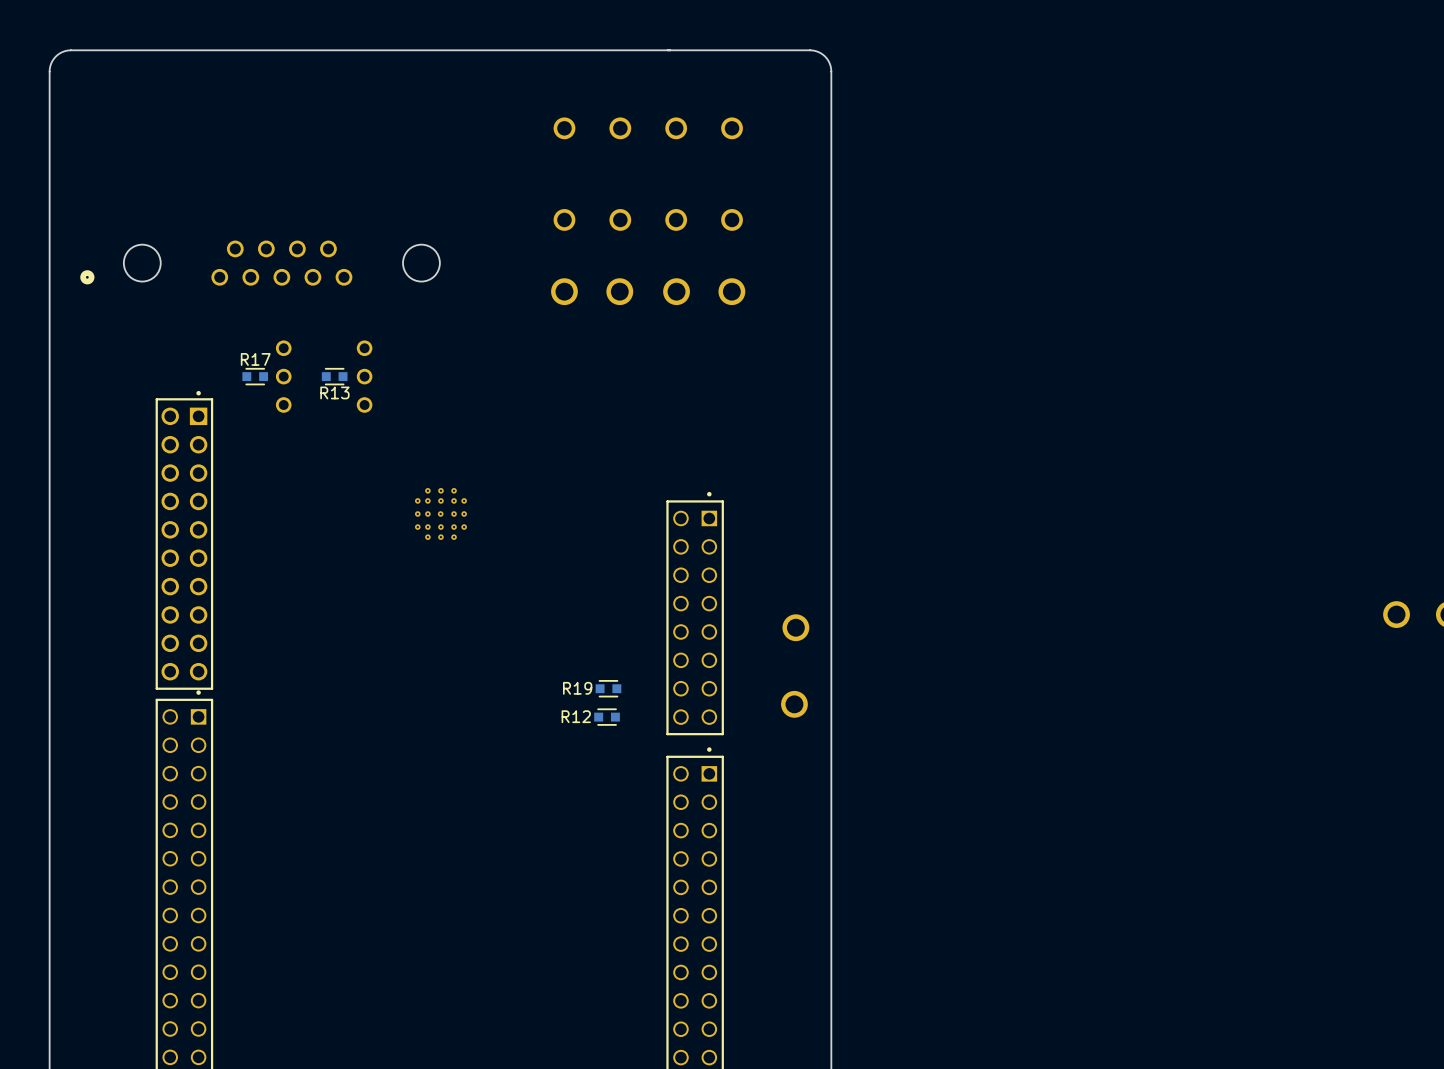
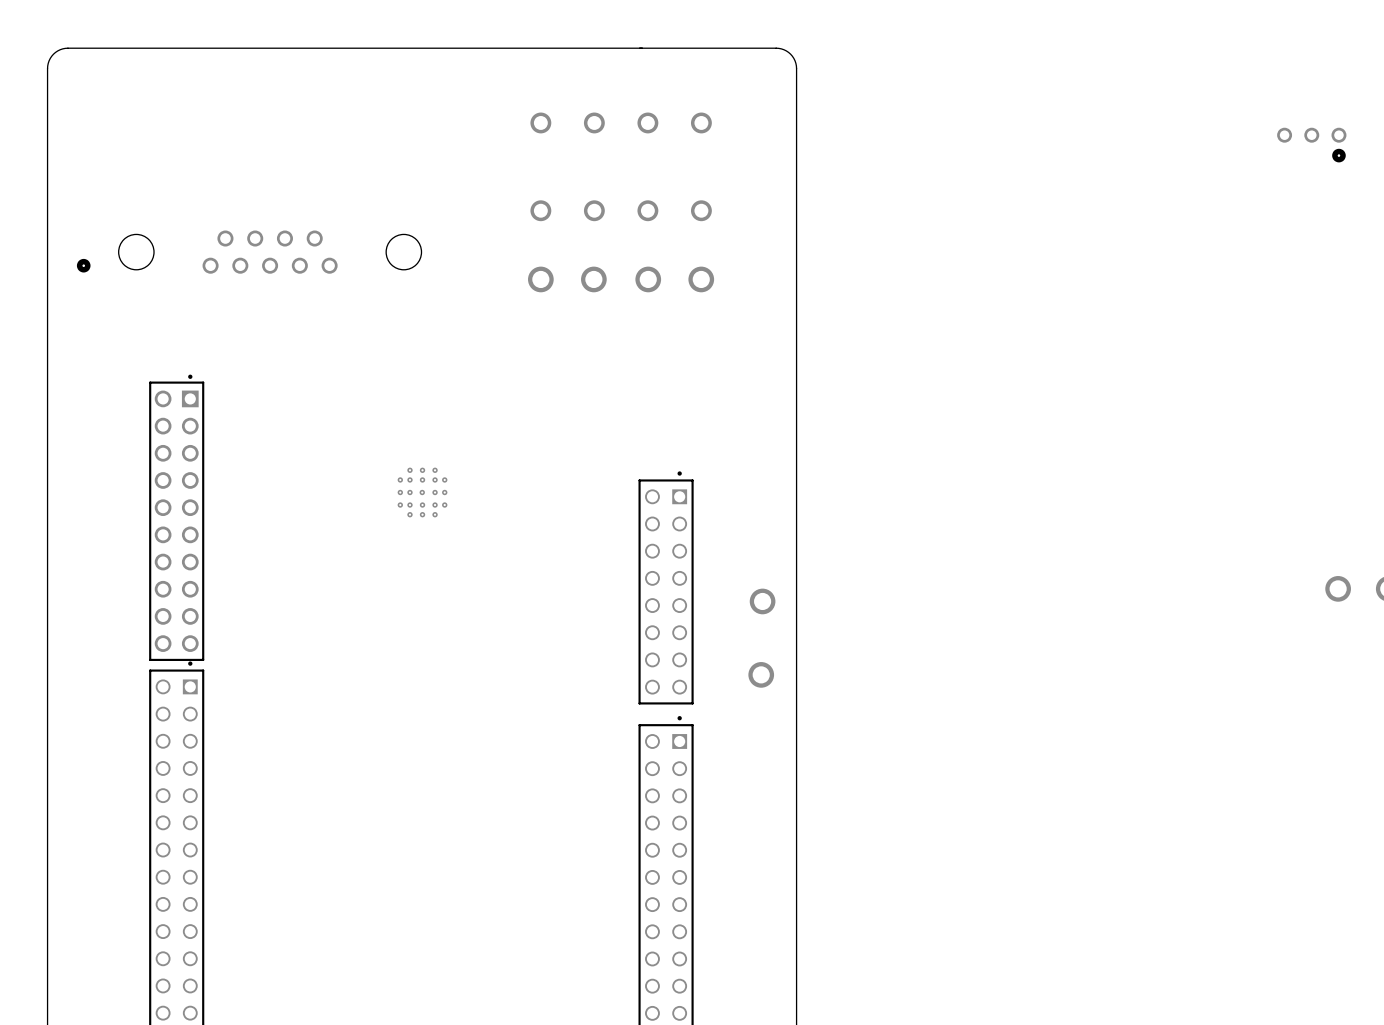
part: none -> (1311, 145)
R17: (255, 376) -> none
part: (283, 376) -> none
R13: (334, 376) -> none
part: (364, 376) -> none
R19: (608, 688) -> none
R12: (607, 717) -> none

